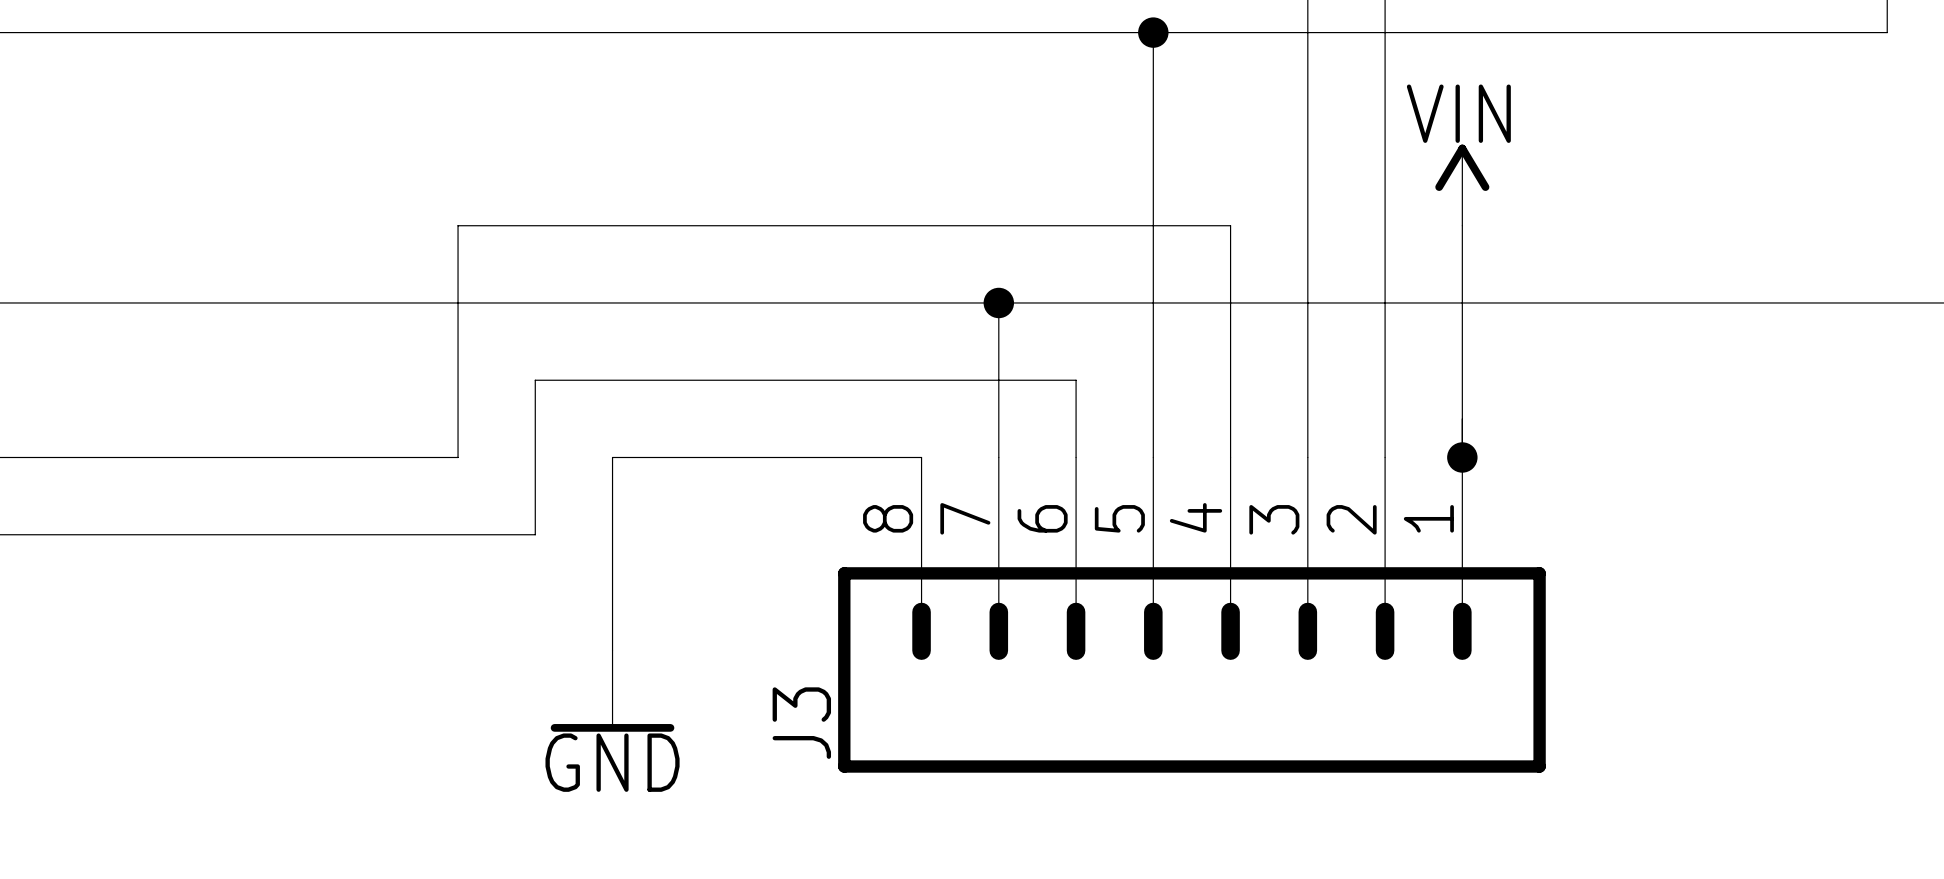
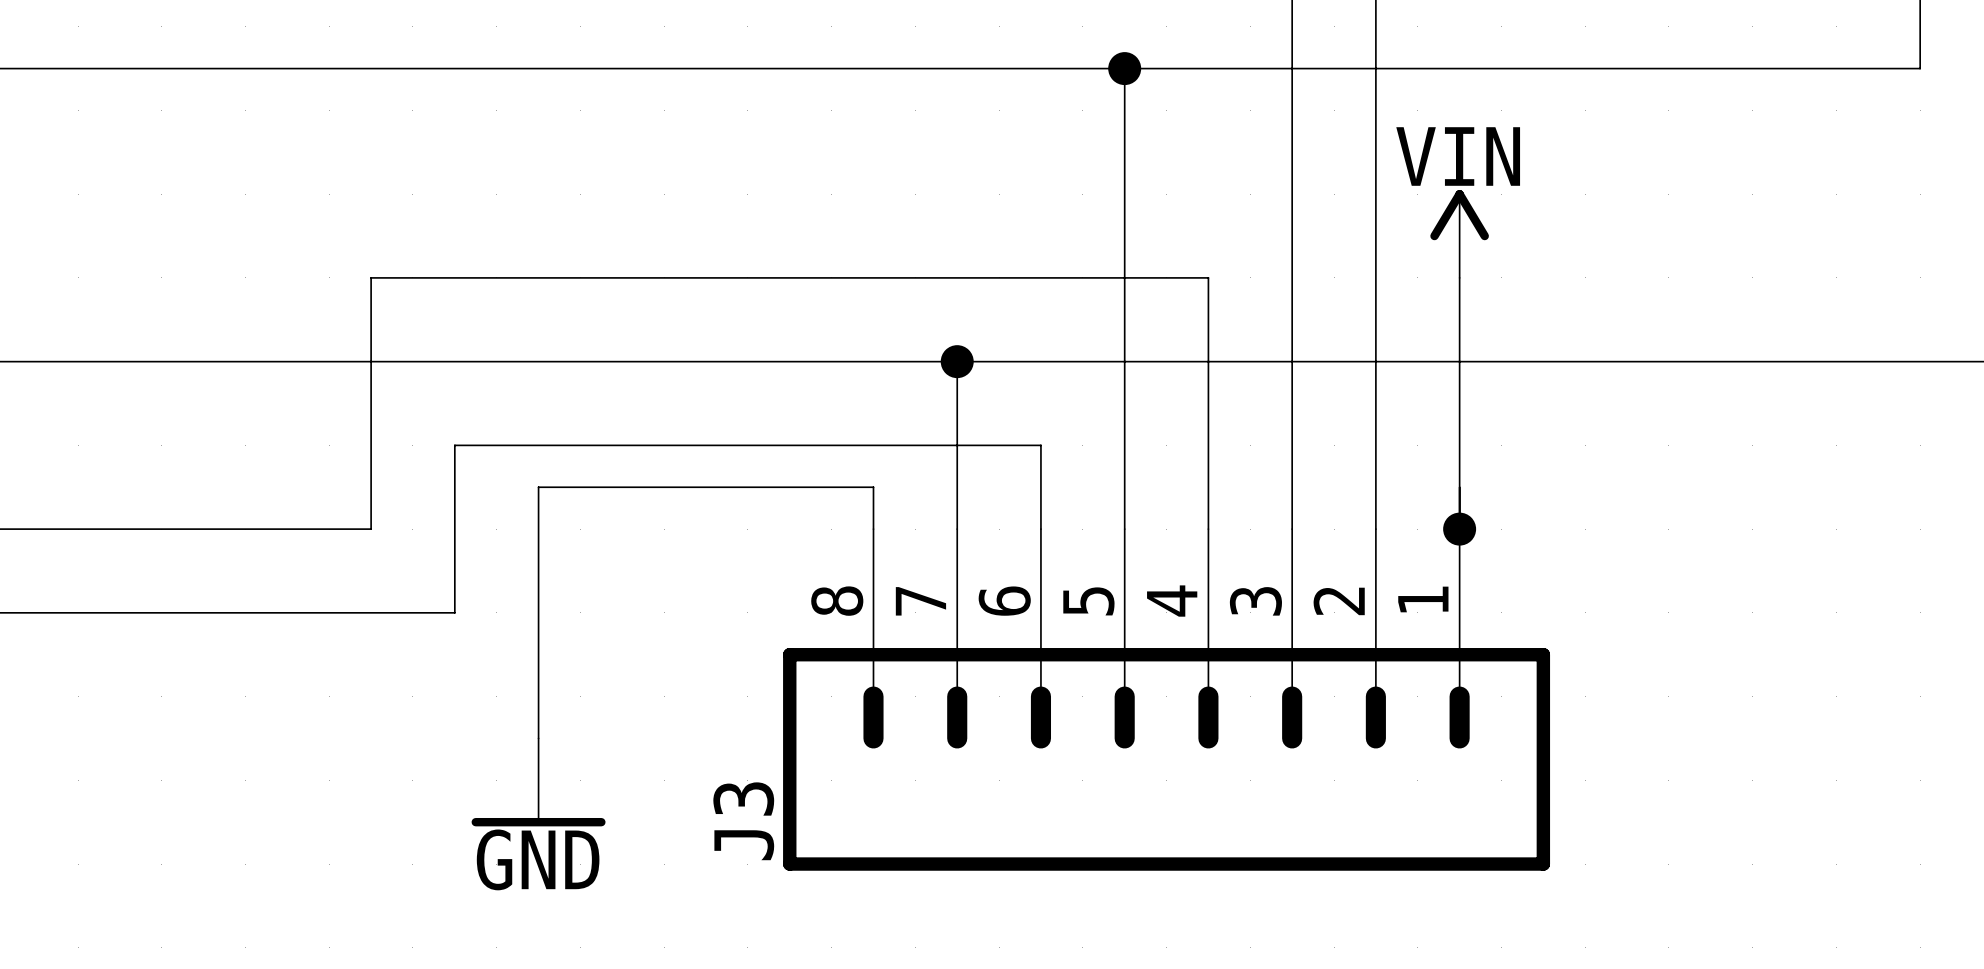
wire: (612, 457) (921, 457) -> (538, 529) (538, 487) (873, 487) (873, 529)

